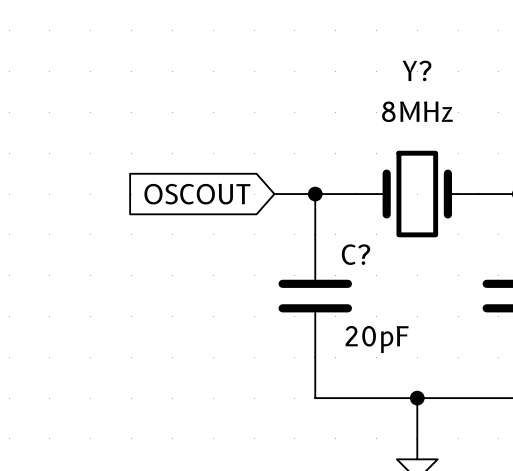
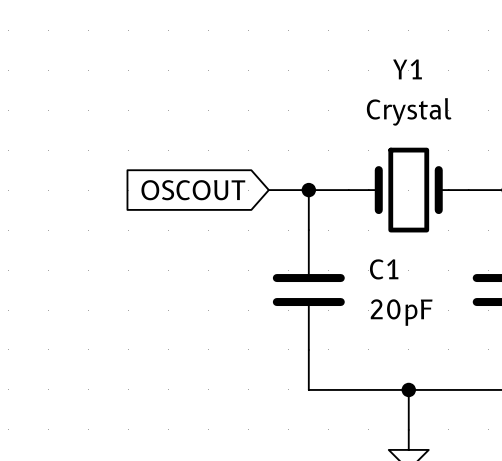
Y? name: Y? (417, 70) -> Y1 (407, 69)
Y? value: 8MHz (417, 111) -> Crystal (409, 111)
C? name: C? (356, 254) -> C1 (384, 269)
C? value position: 20pF (377, 339) -> 20pF (401, 312)

